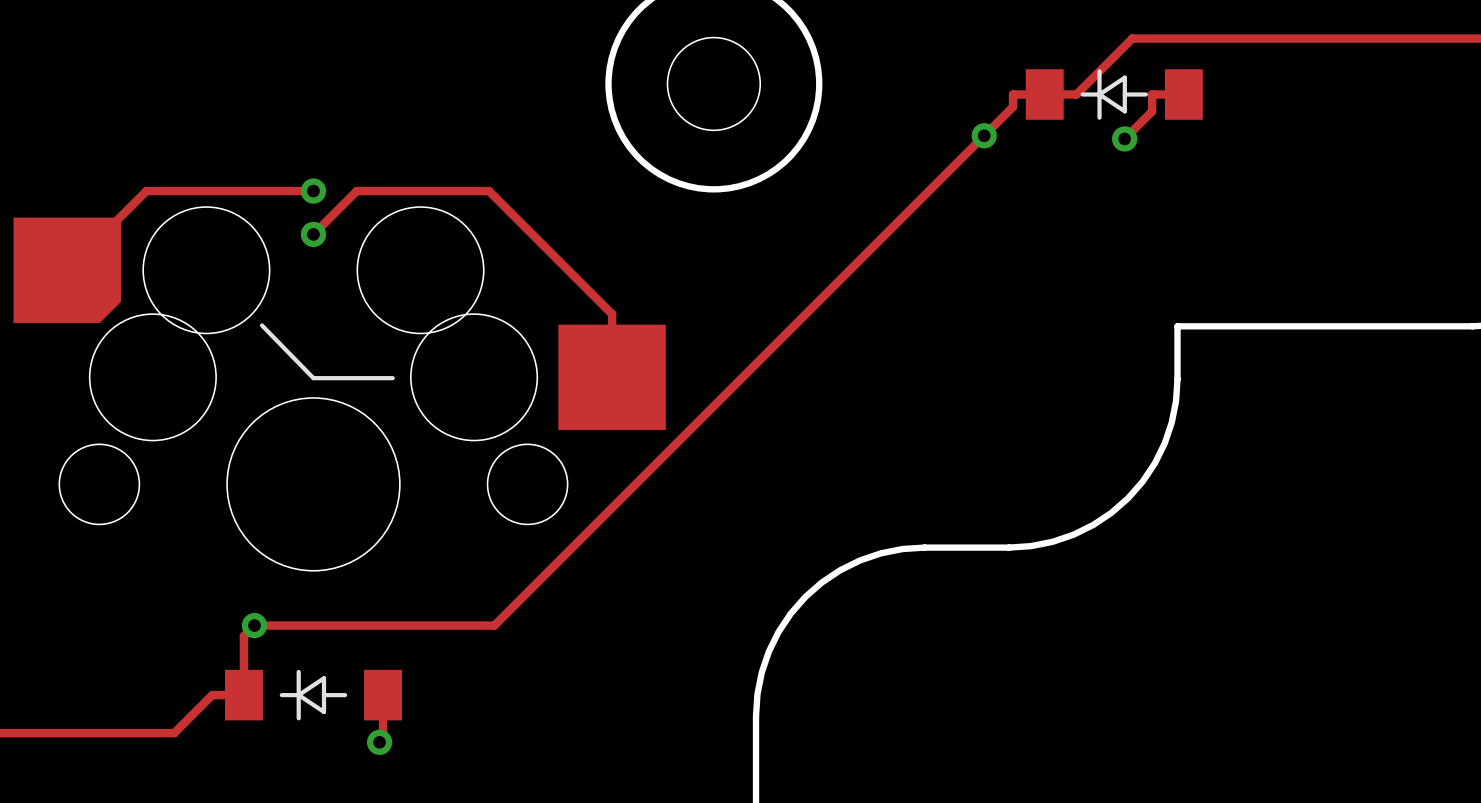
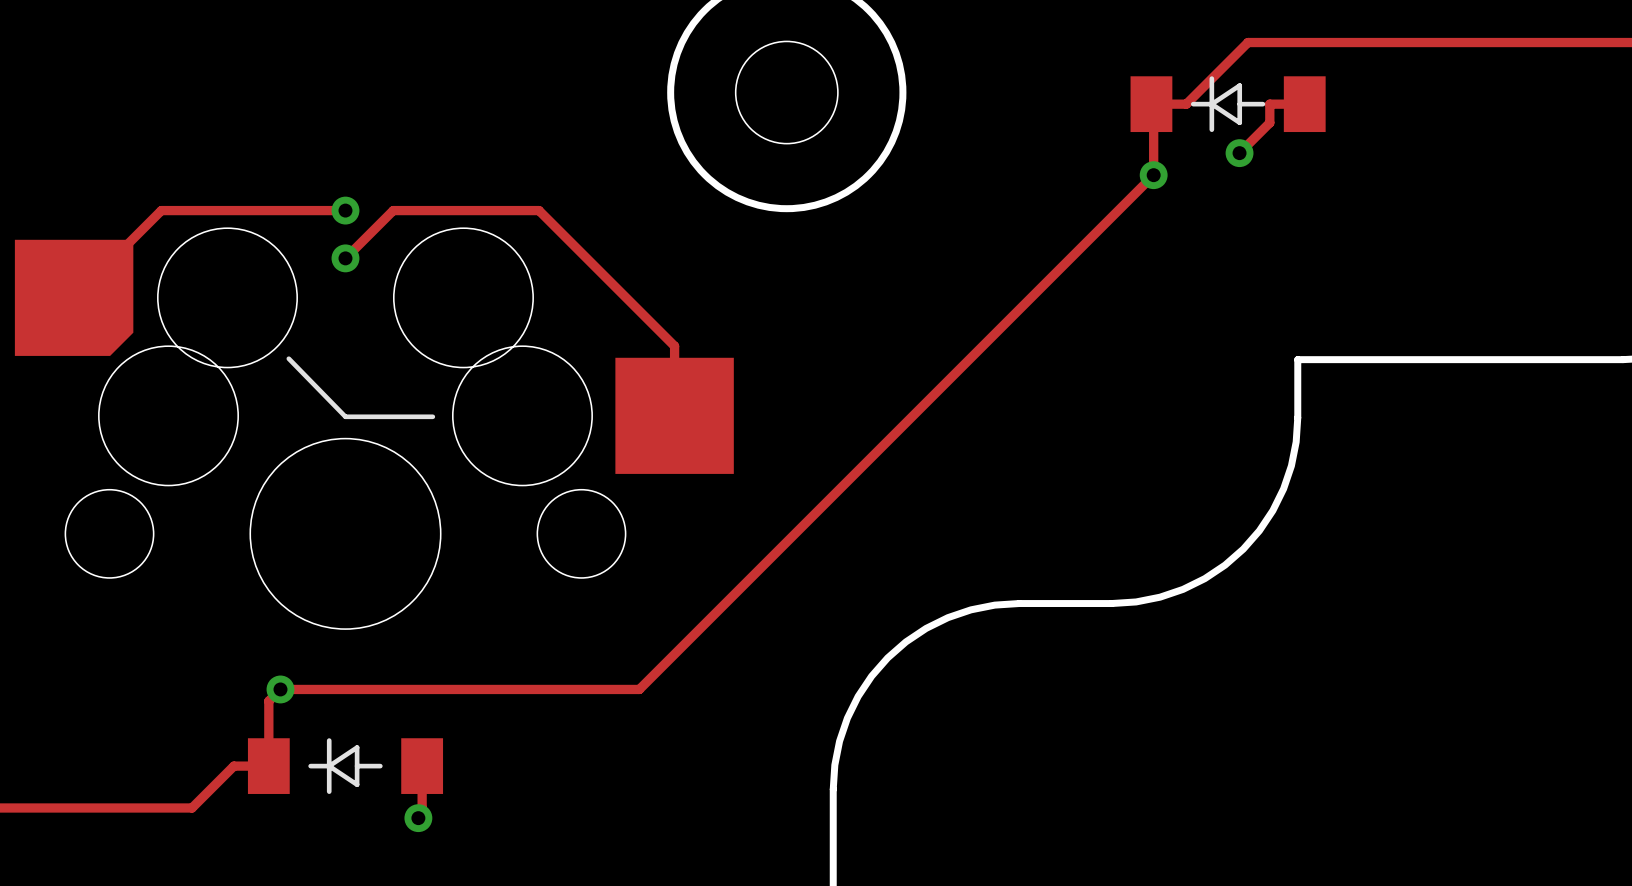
track: (1044, 94) (1013, 94) (1013, 106) (494, 625) -> (1168, 104) (1153, 119) (1153, 175) (639, 689) (544, 689)
via position: (984, 135) -> (1153, 175)

